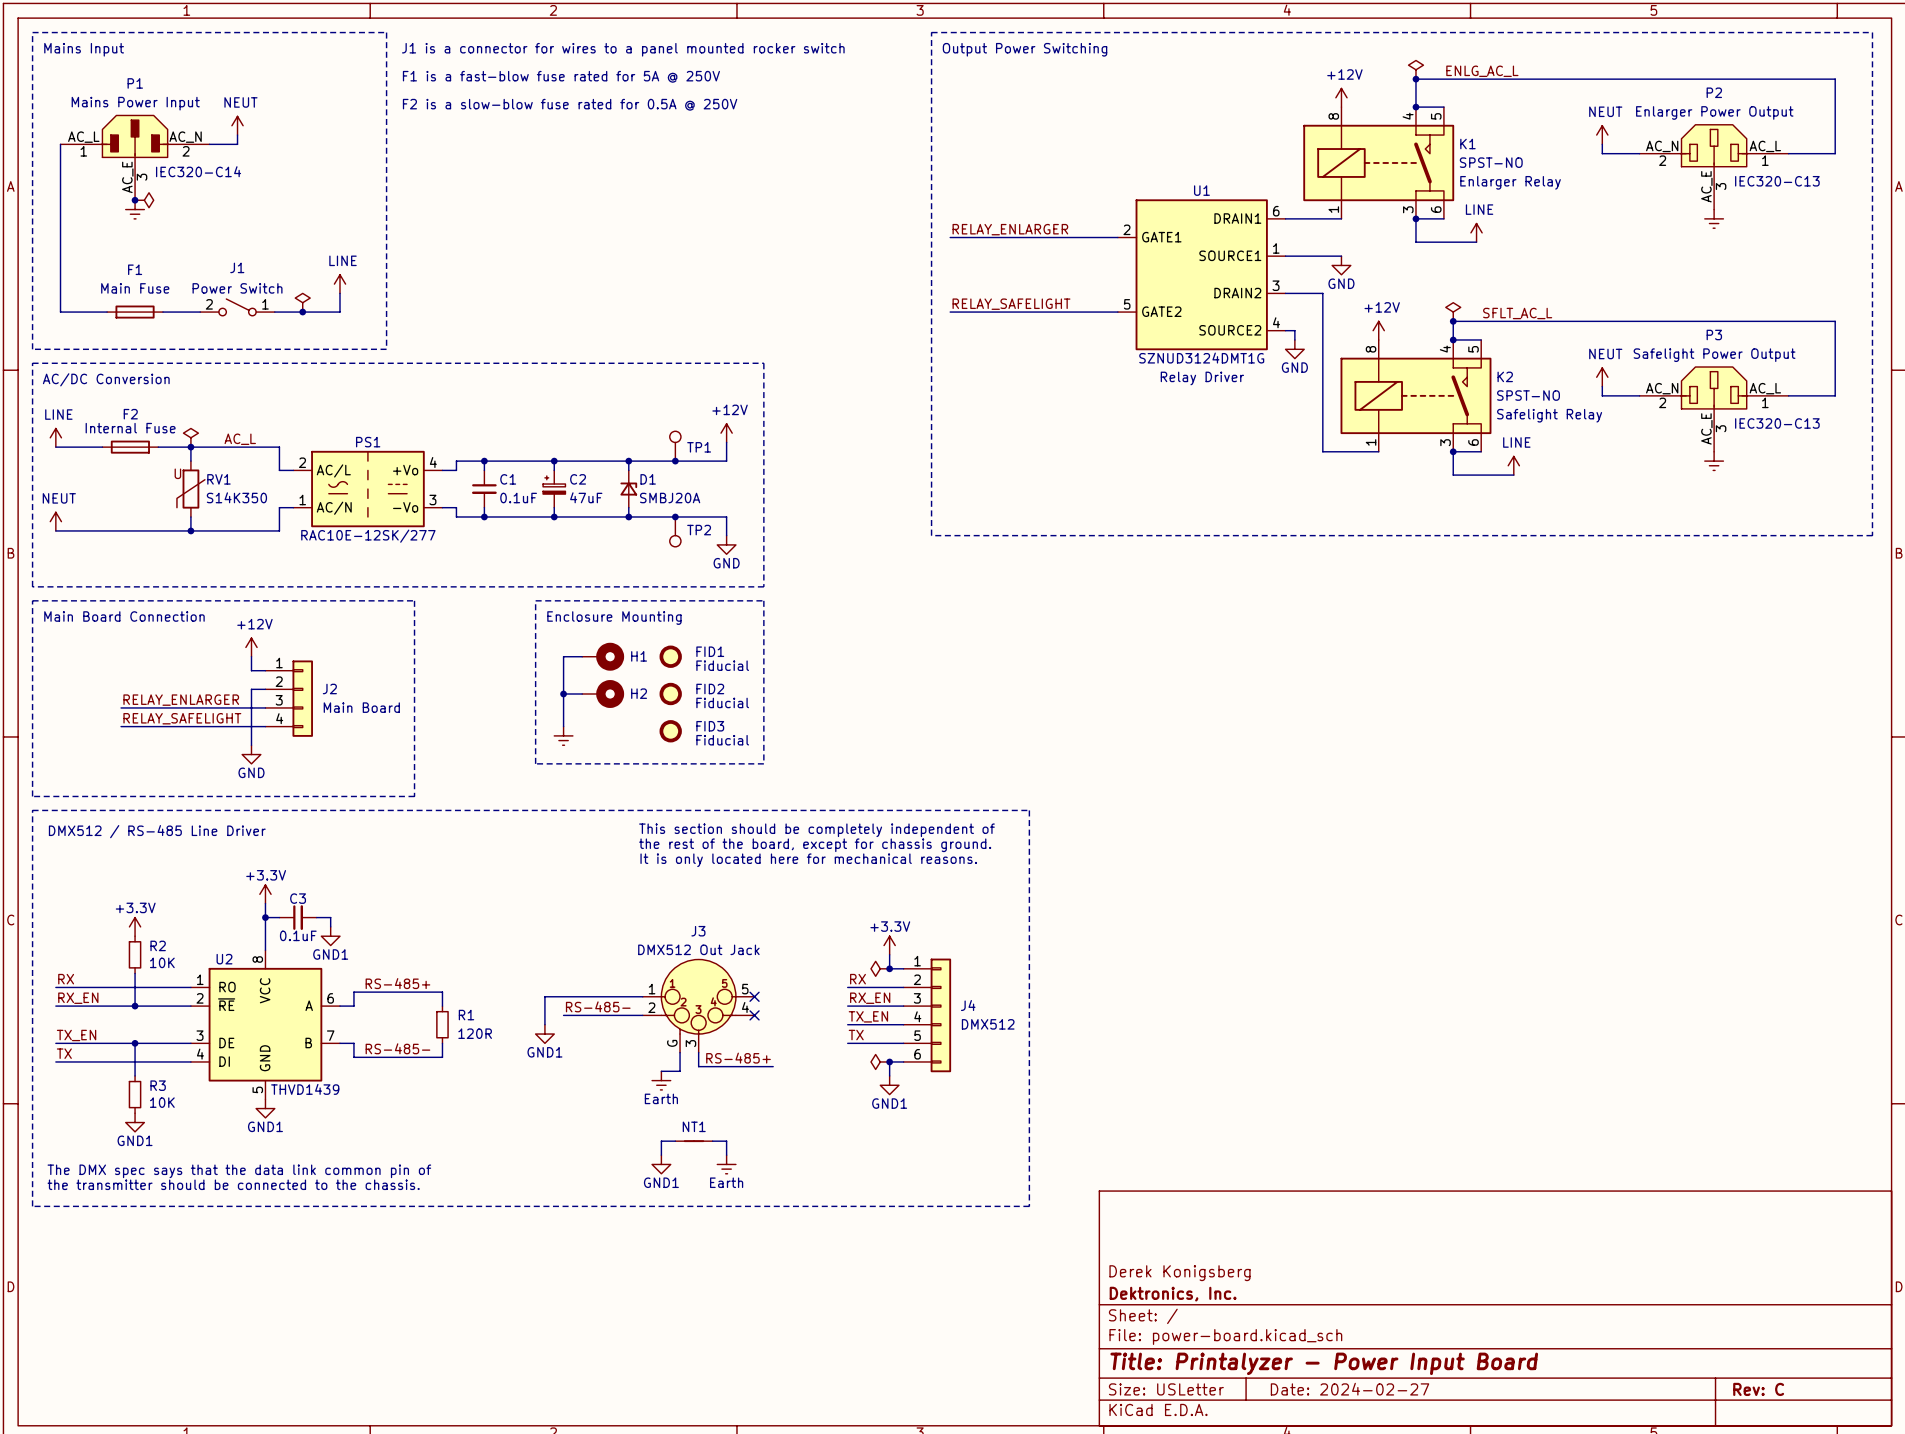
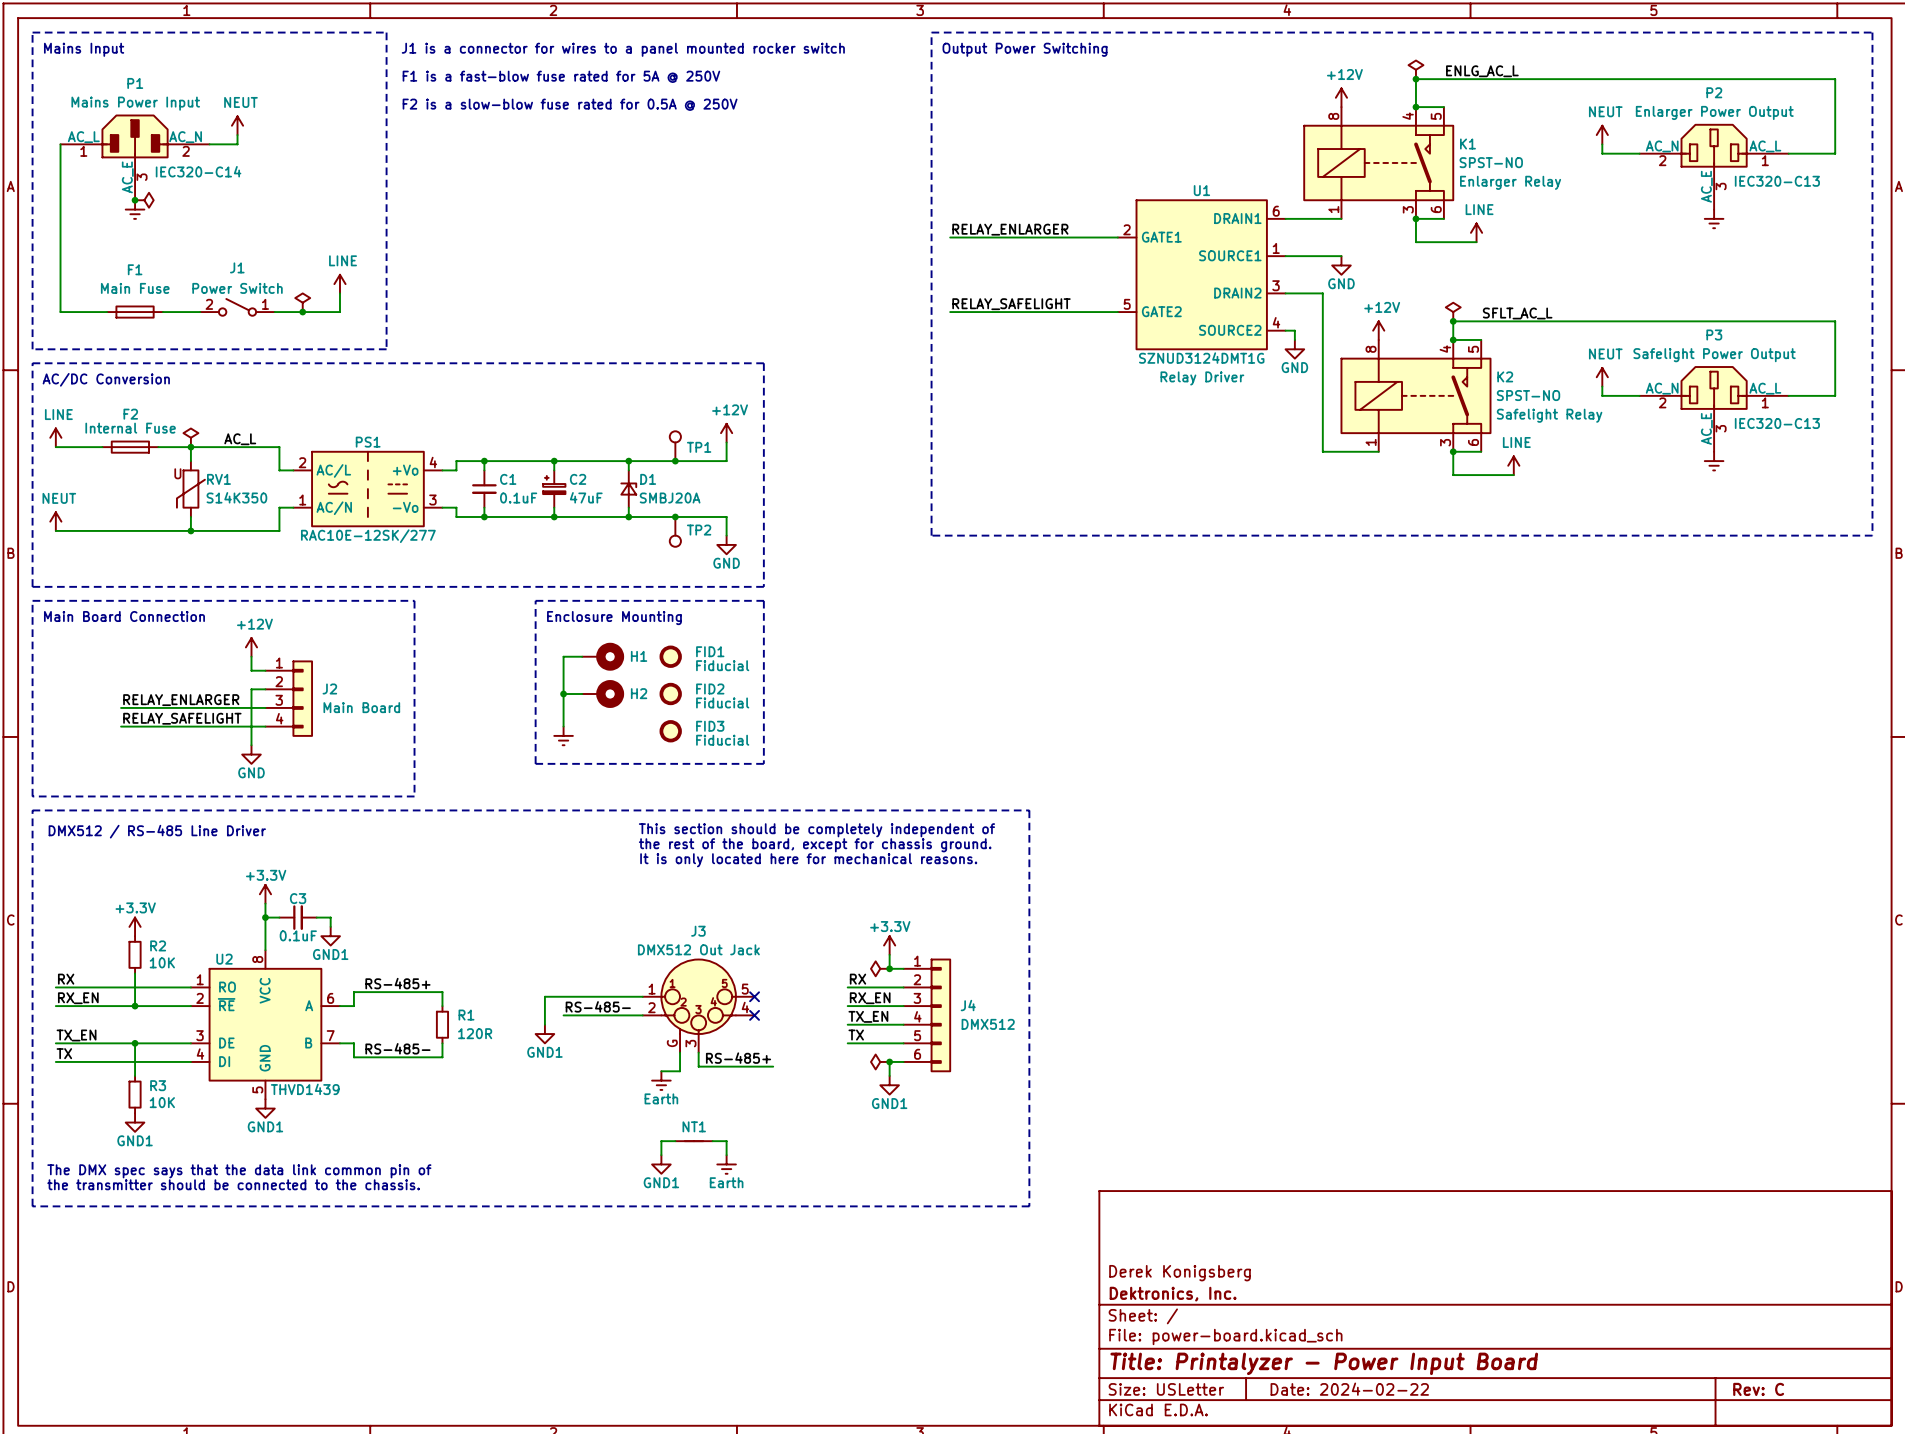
title block: Date: 2024-02-27 (1350, 1389) -> Date: 2024-02-22 (1349, 1389)

